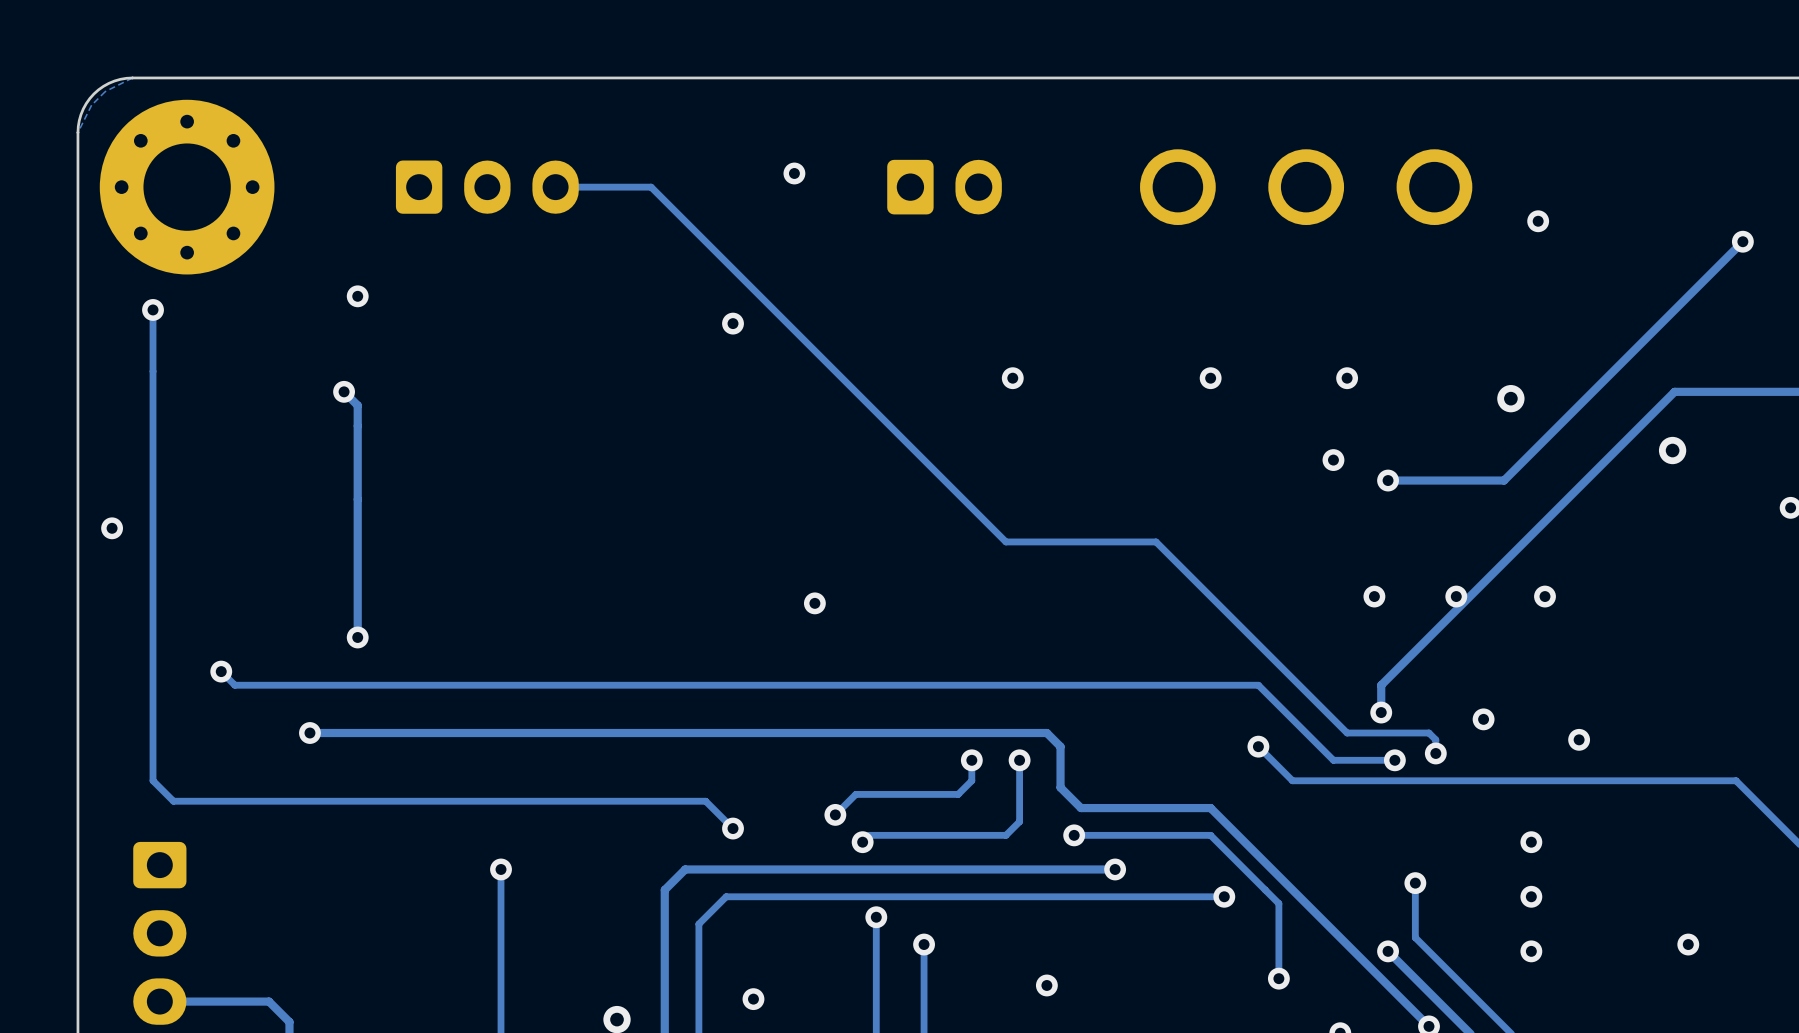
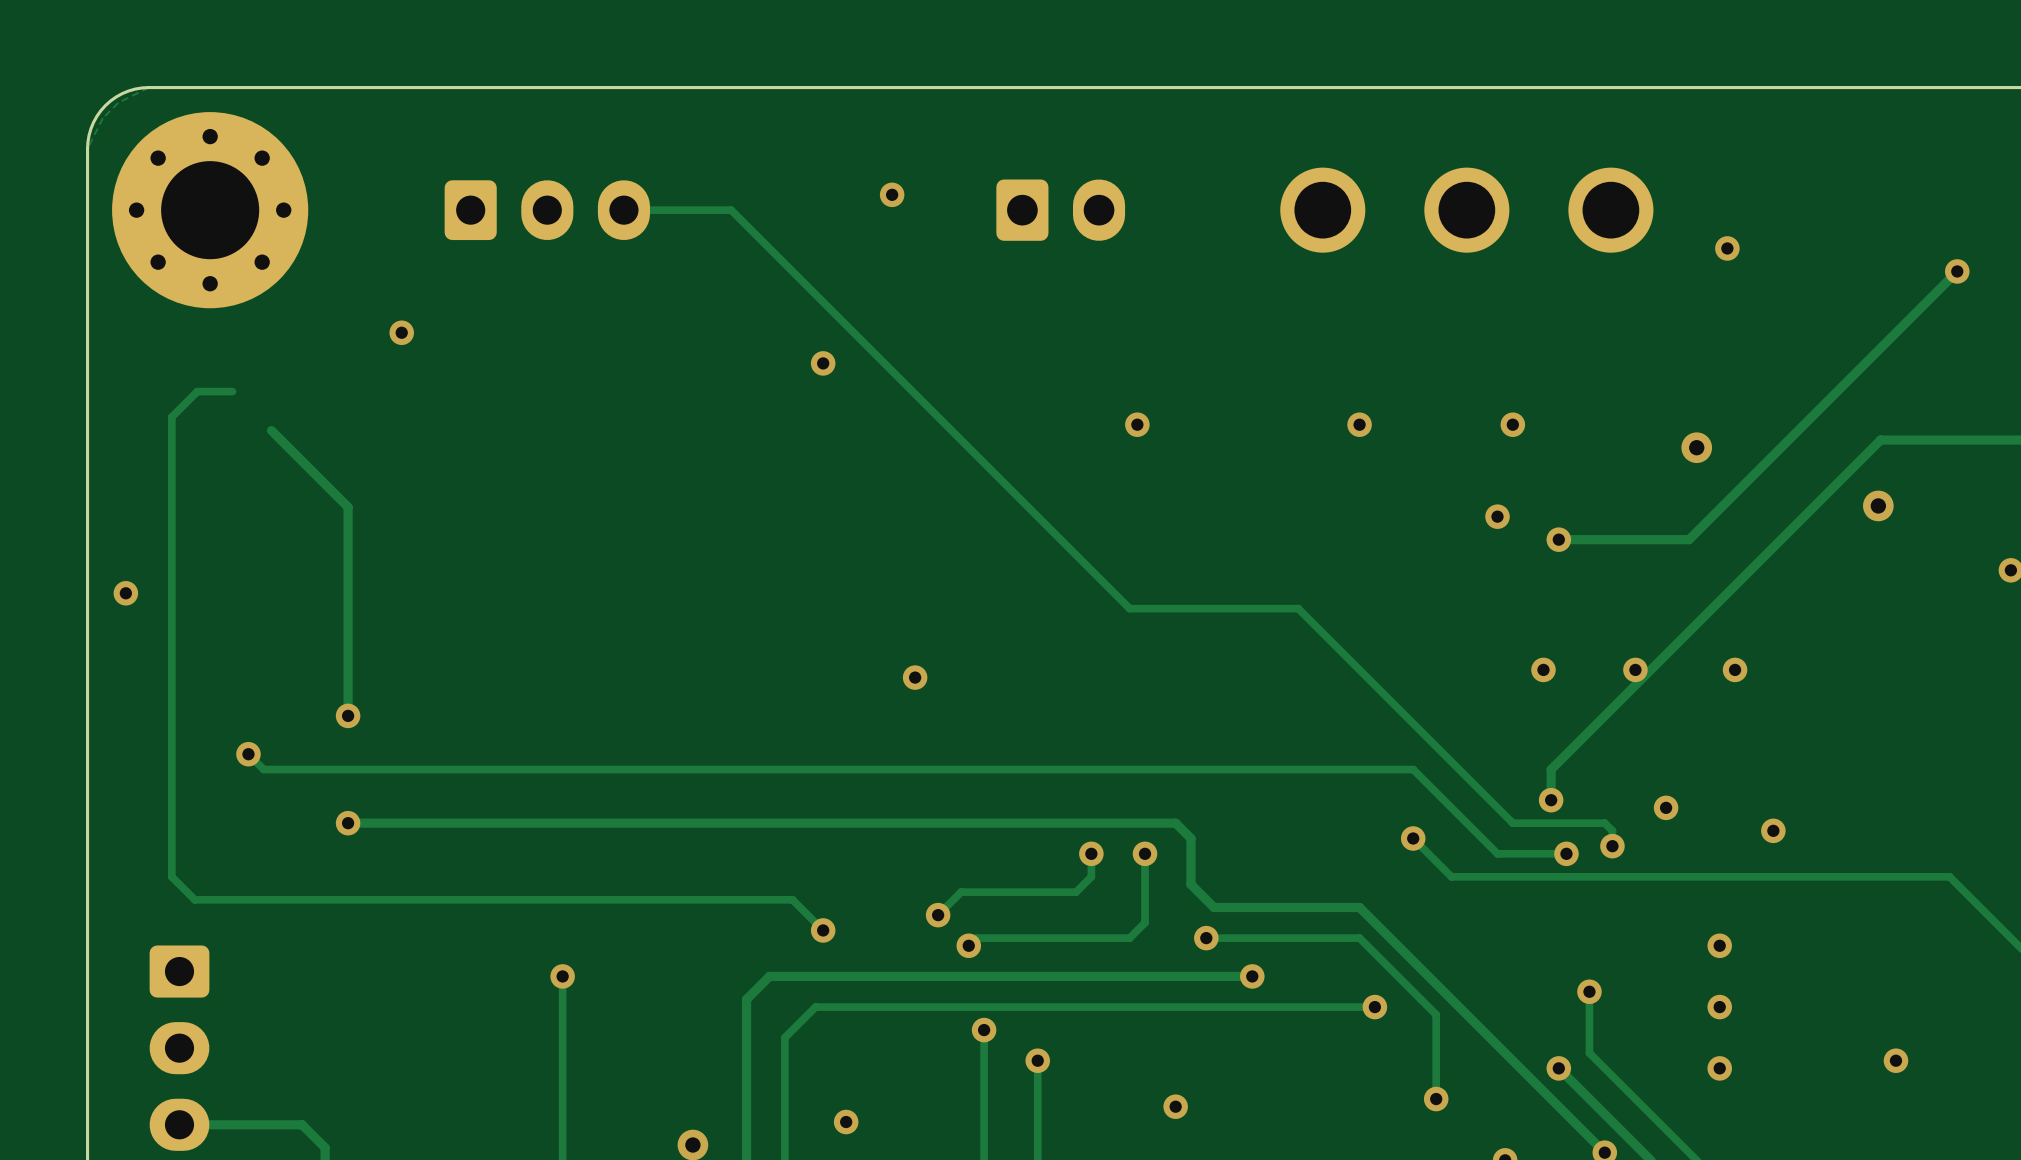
track: (153, 309) (153, 371) -> (232, 391) (197, 391) (171, 417)
via: (153, 309) -> none
track: none -> (271, 430) (348, 507) (348, 715)
track: (344, 391) (357, 405) (357, 637) -> none
via: (344, 391) -> none
via position: (357, 637) -> (348, 715)

